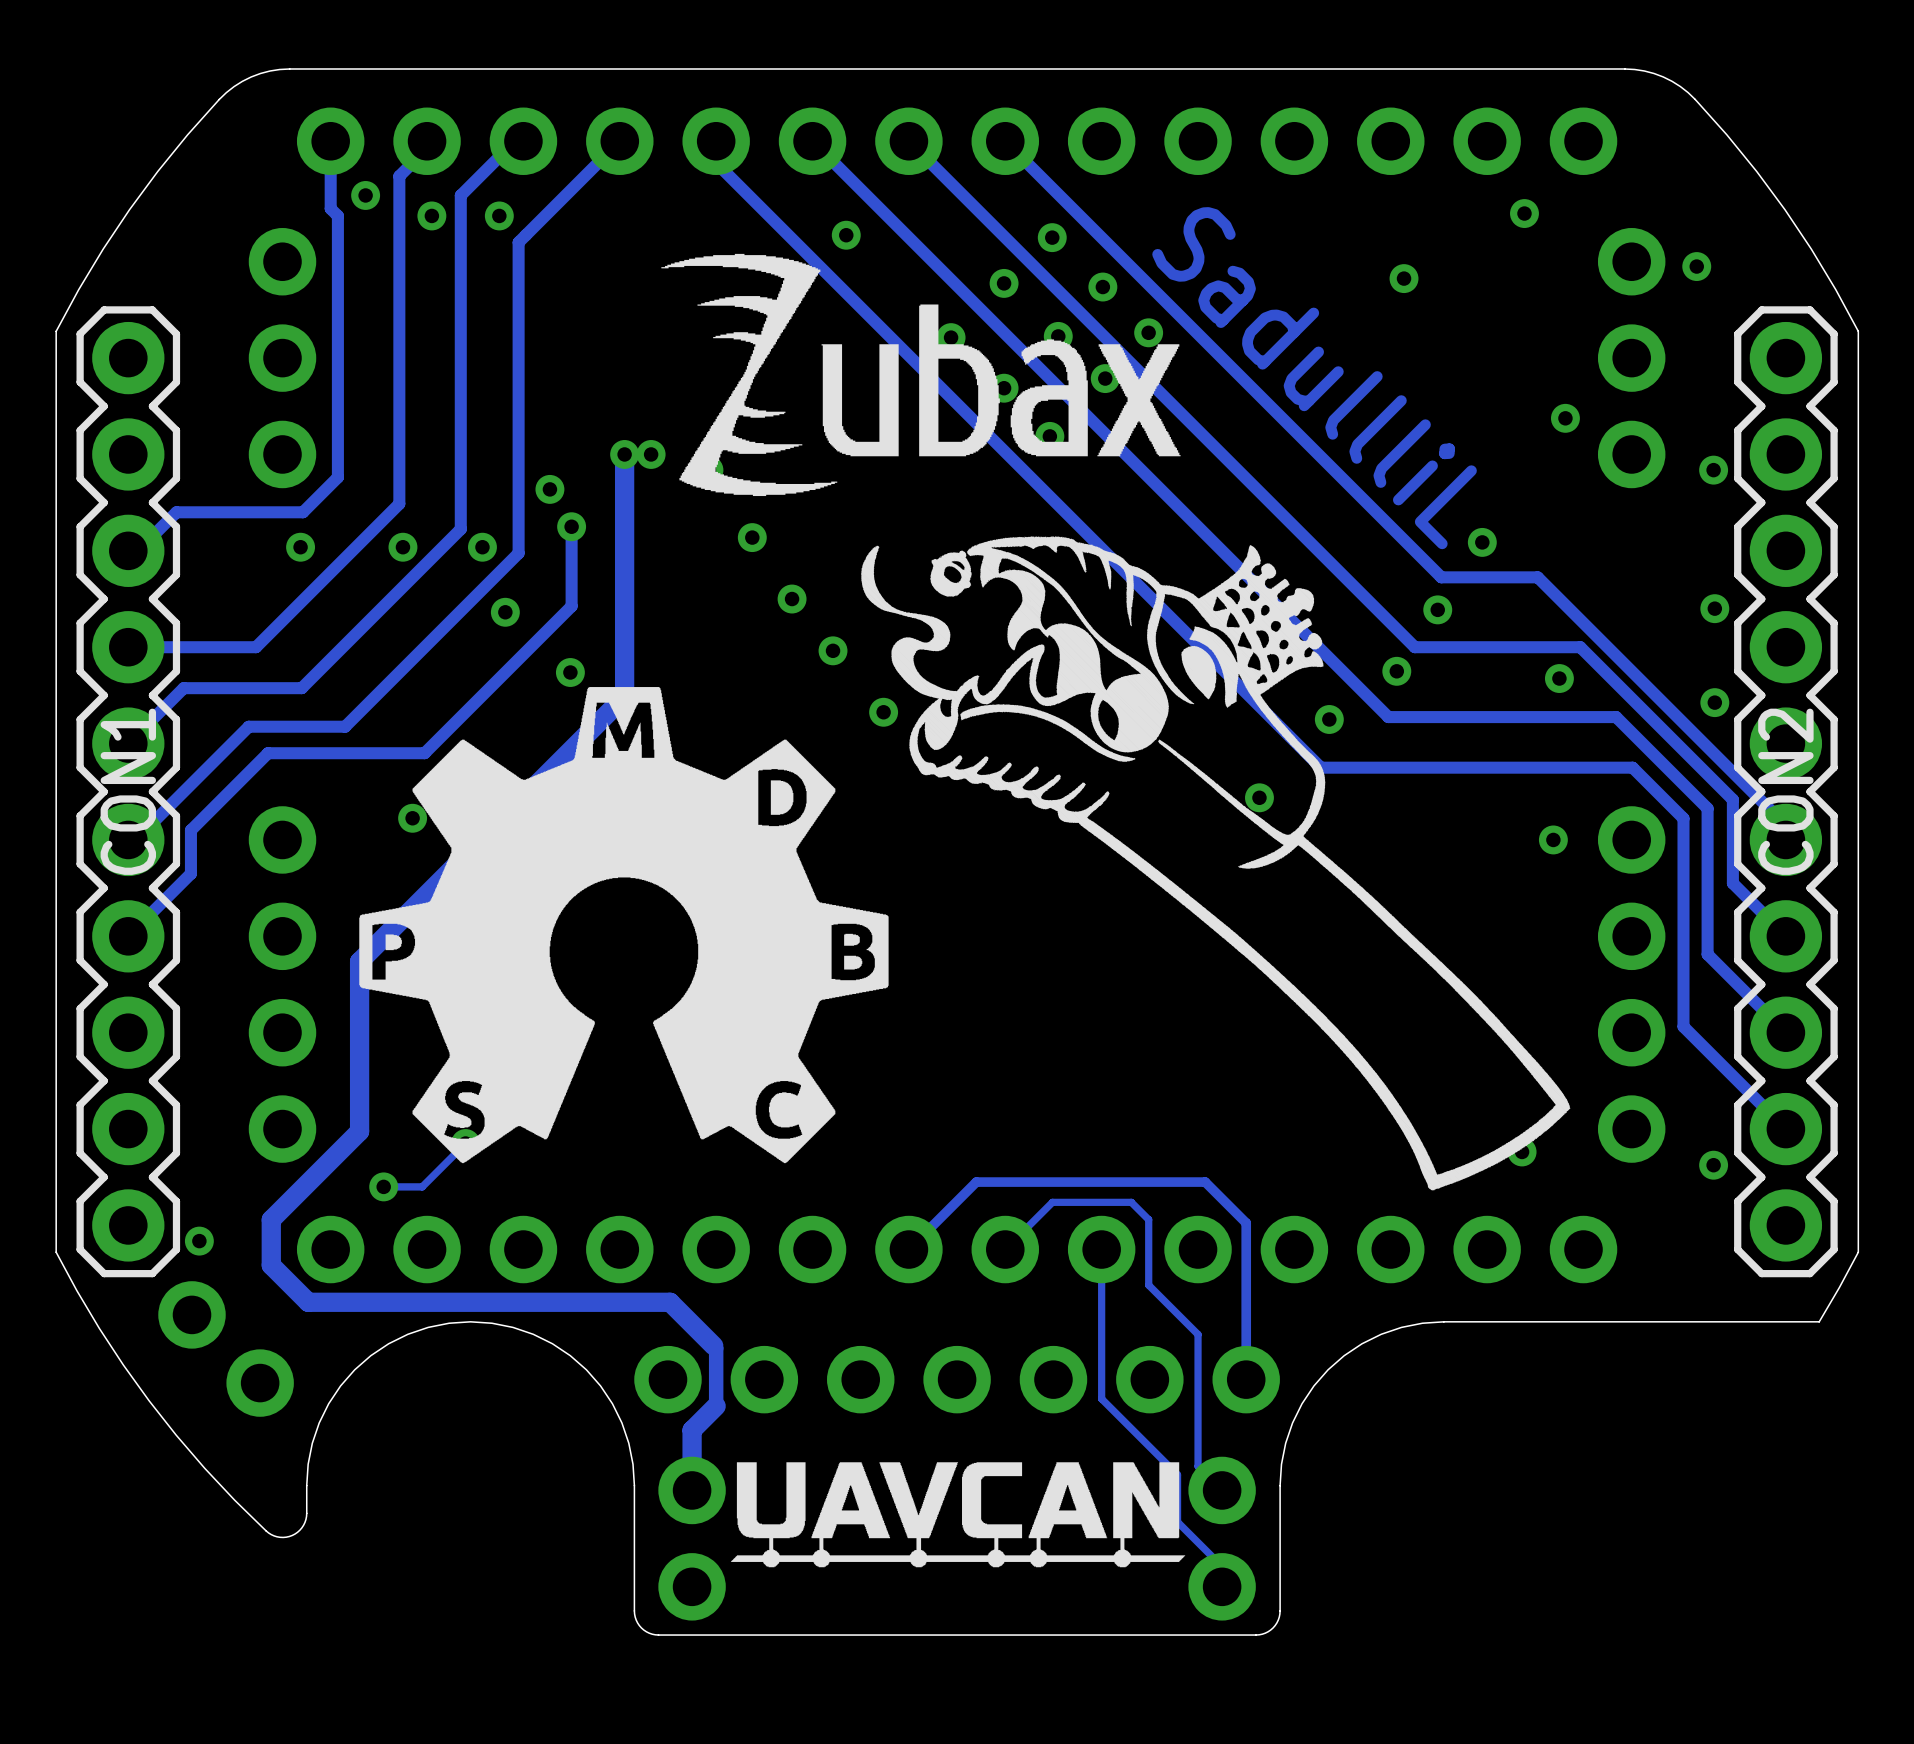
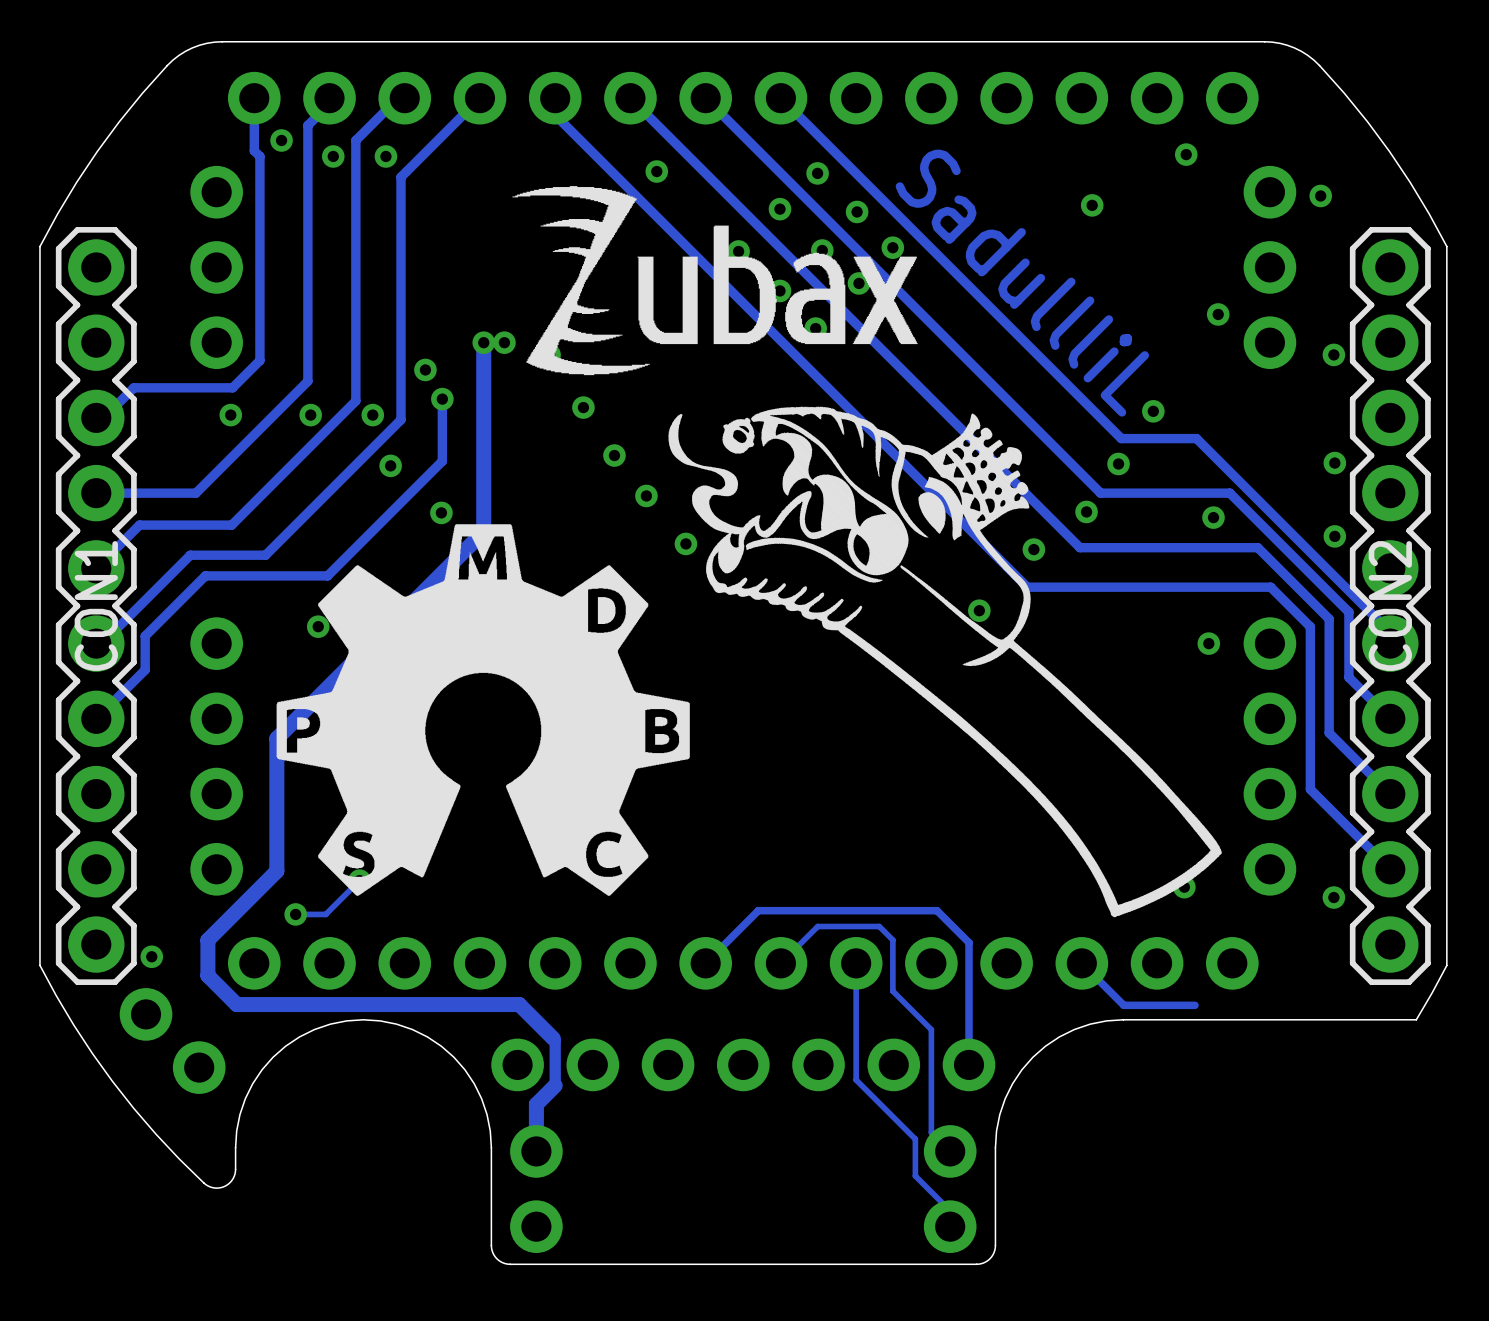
track: none -> (1081, 963) (1123, 1005) (1195, 1005)
drawing: [730, 1462, 1186, 1568] -> none

